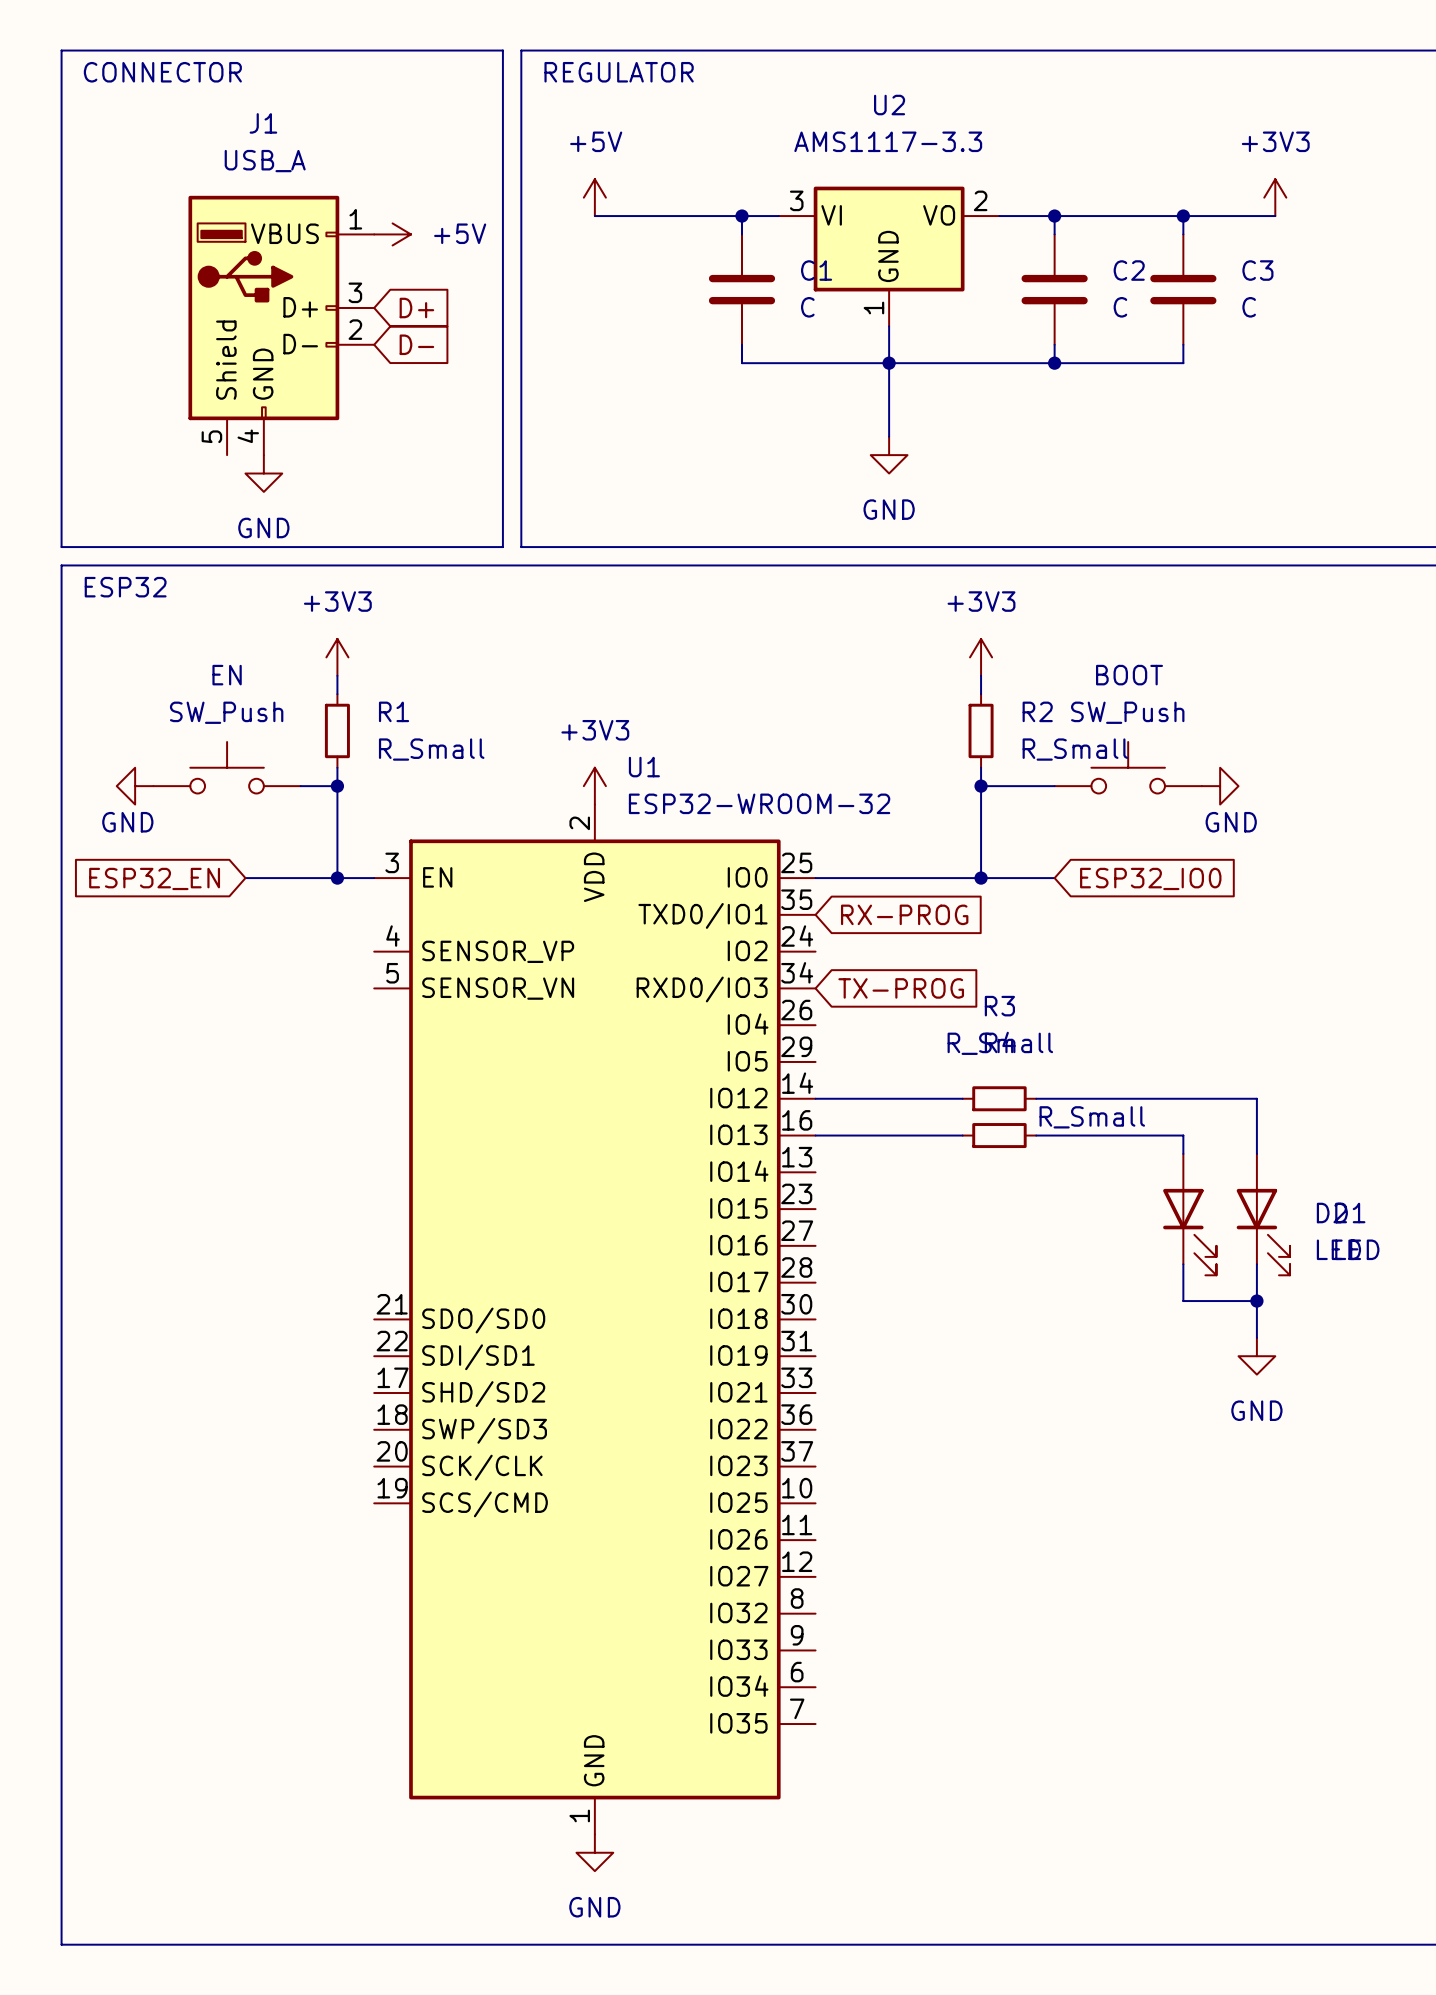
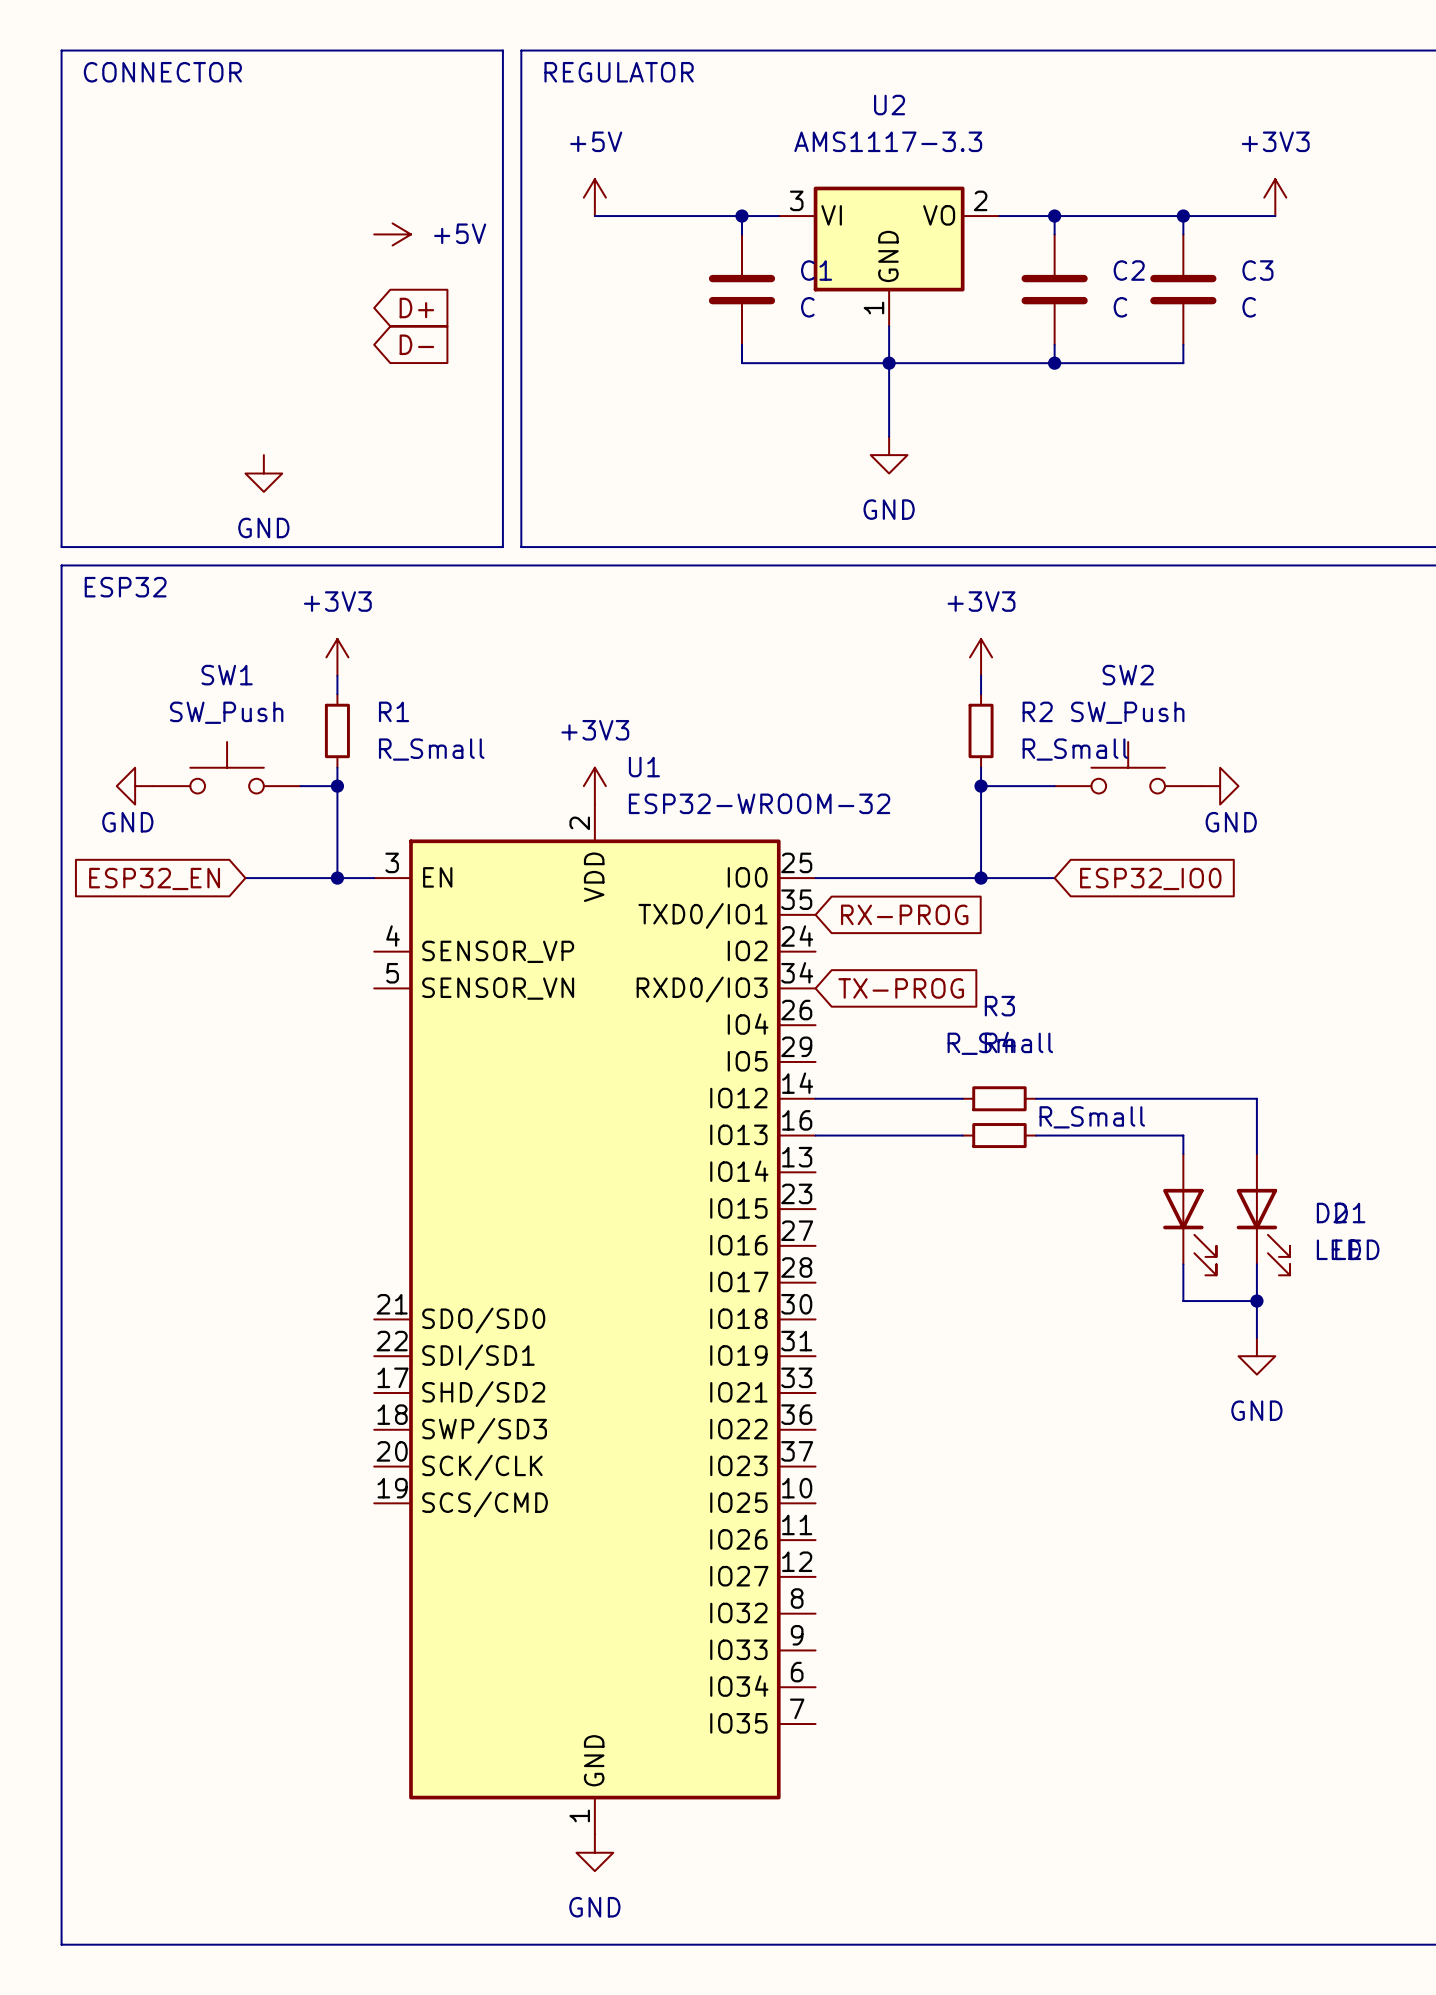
J1: USB_A (281, 325) -> none
EN name: EN (227, 675) -> SW1 (227, 675)
BOOT name: BOOT (1129, 675) -> SW2 (1128, 675)

